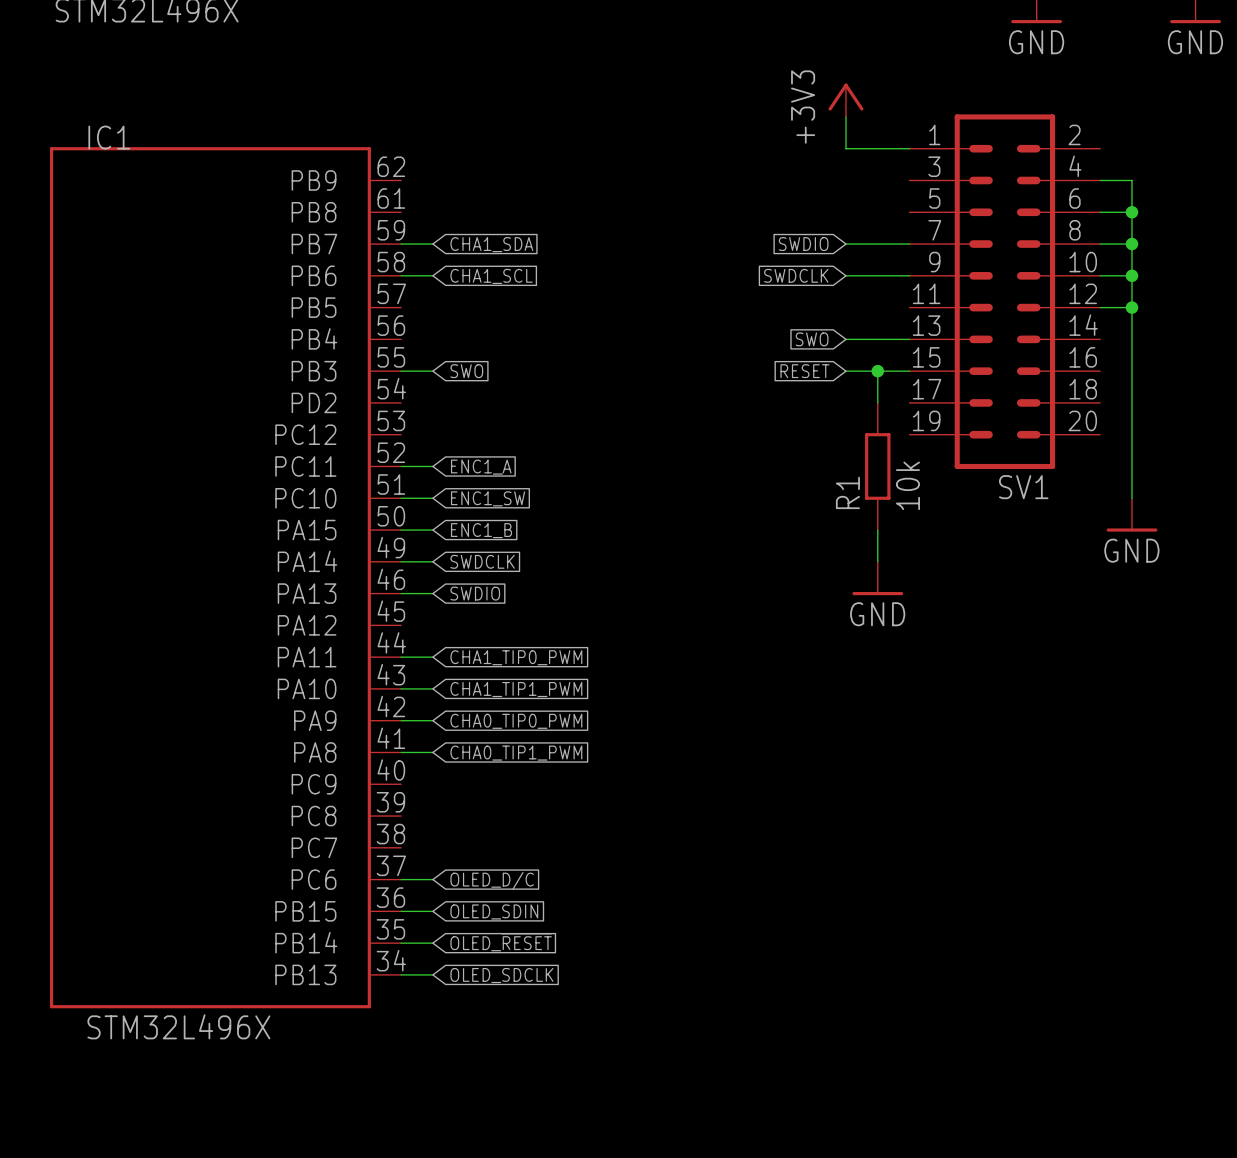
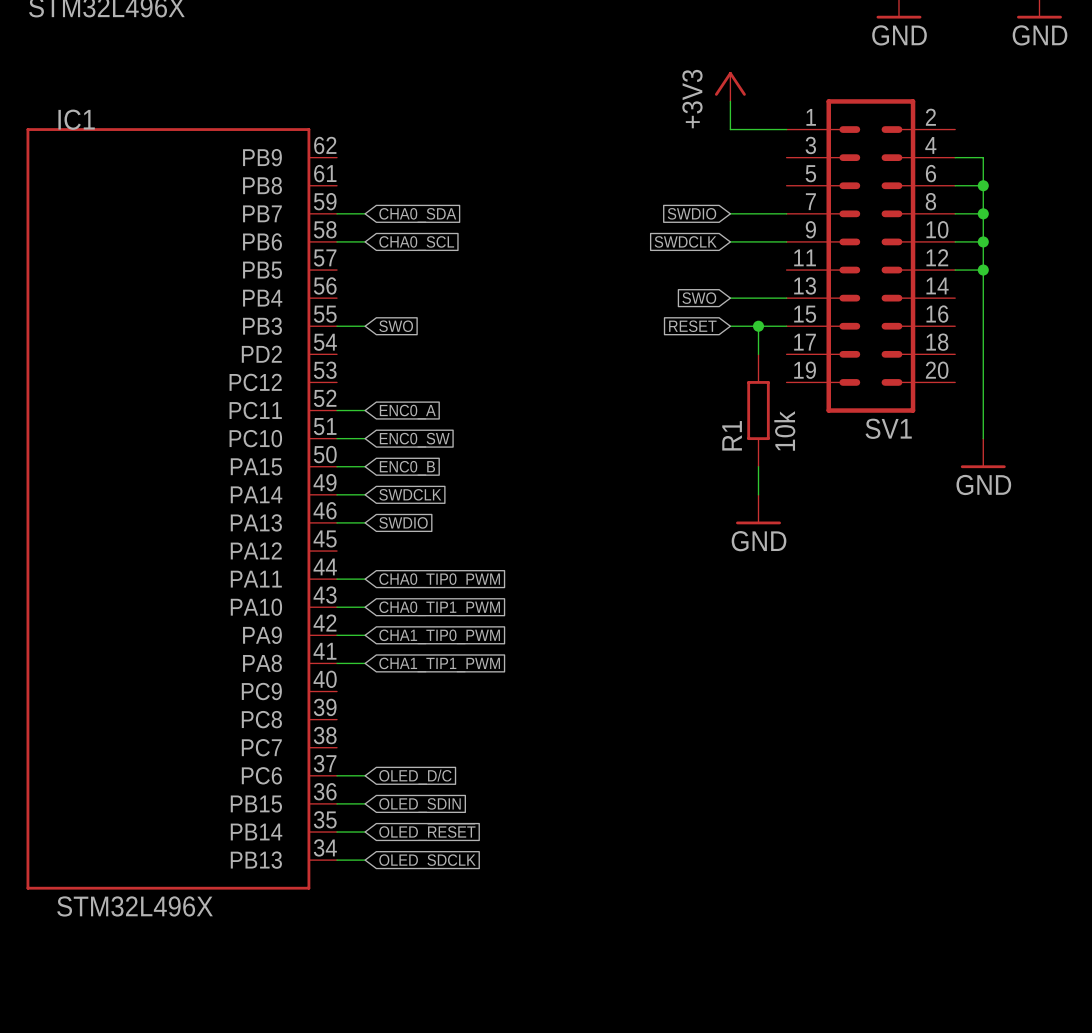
global label: CHA1_SDA (491, 244) -> CHA0_SDA (417, 215)
global label: CHA1_SCL (491, 276) -> CHA0_SCL (416, 243)
global label: ENC1_A (481, 467) -> ENC0_A (407, 412)
global label: ENC1_SW (488, 498) -> ENC0_SW (414, 440)
global label: ENC1_B (481, 530) -> ENC0_B (407, 468)
global label: CHA1_TIP0_PWM (516, 657) -> CHA0_TIP0_PWM (439, 580)
global label: CHA1_TIP1_PWM (516, 689) -> CHA0_TIP1_PWM (439, 608)
global label: CHA0_TIP0_PWM (516, 721) -> CHA1_TIP0_PWM (439, 636)
global label: CHA0_TIP1_PWM (516, 753) -> CHA1_TIP1_PWM (439, 664)

